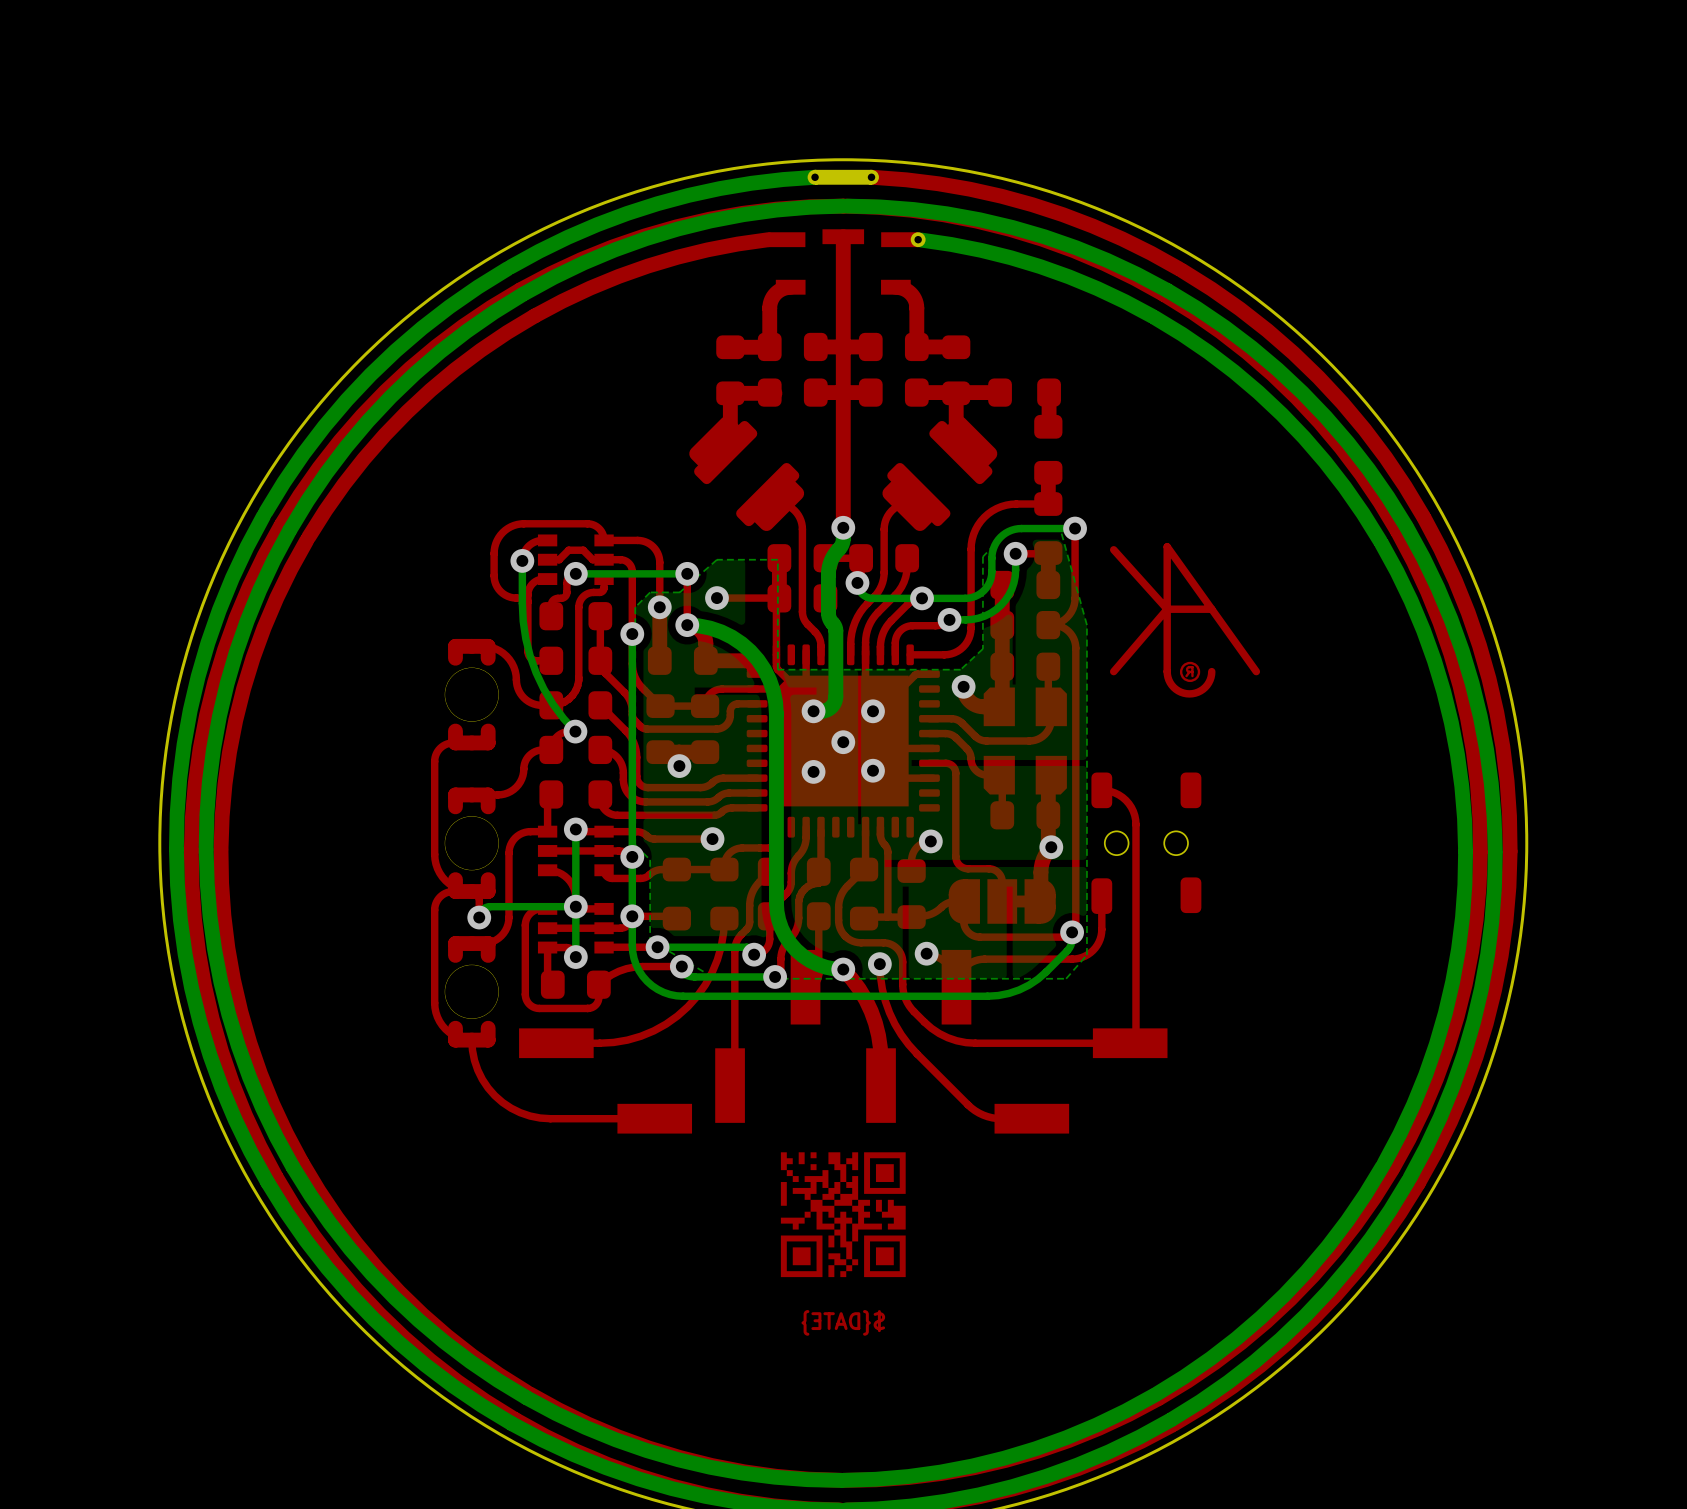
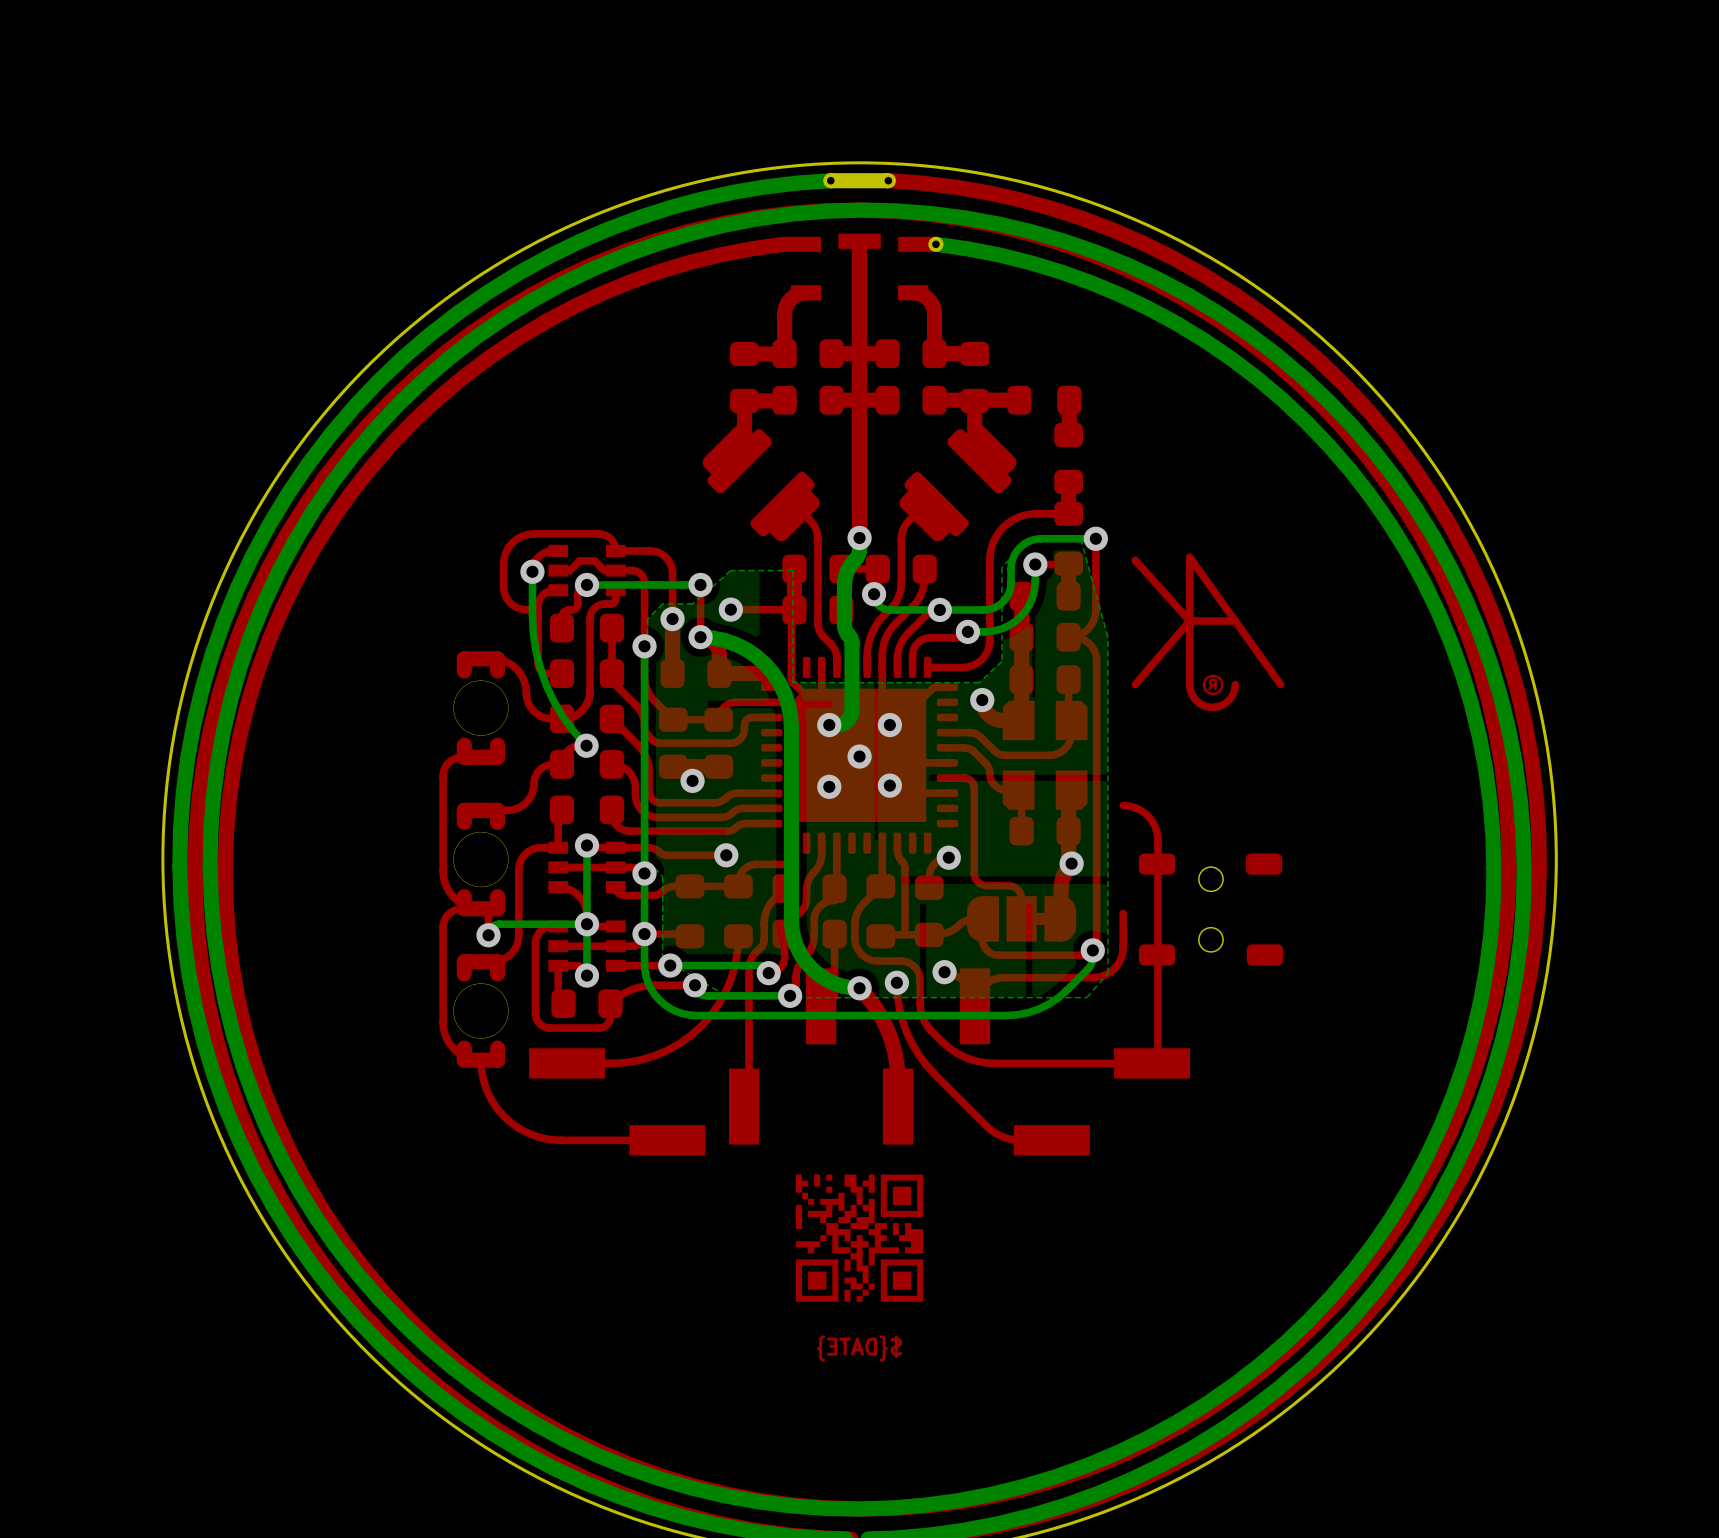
part rotation: 0° (1146, 843) -> 90° clockwise (1210, 909)

